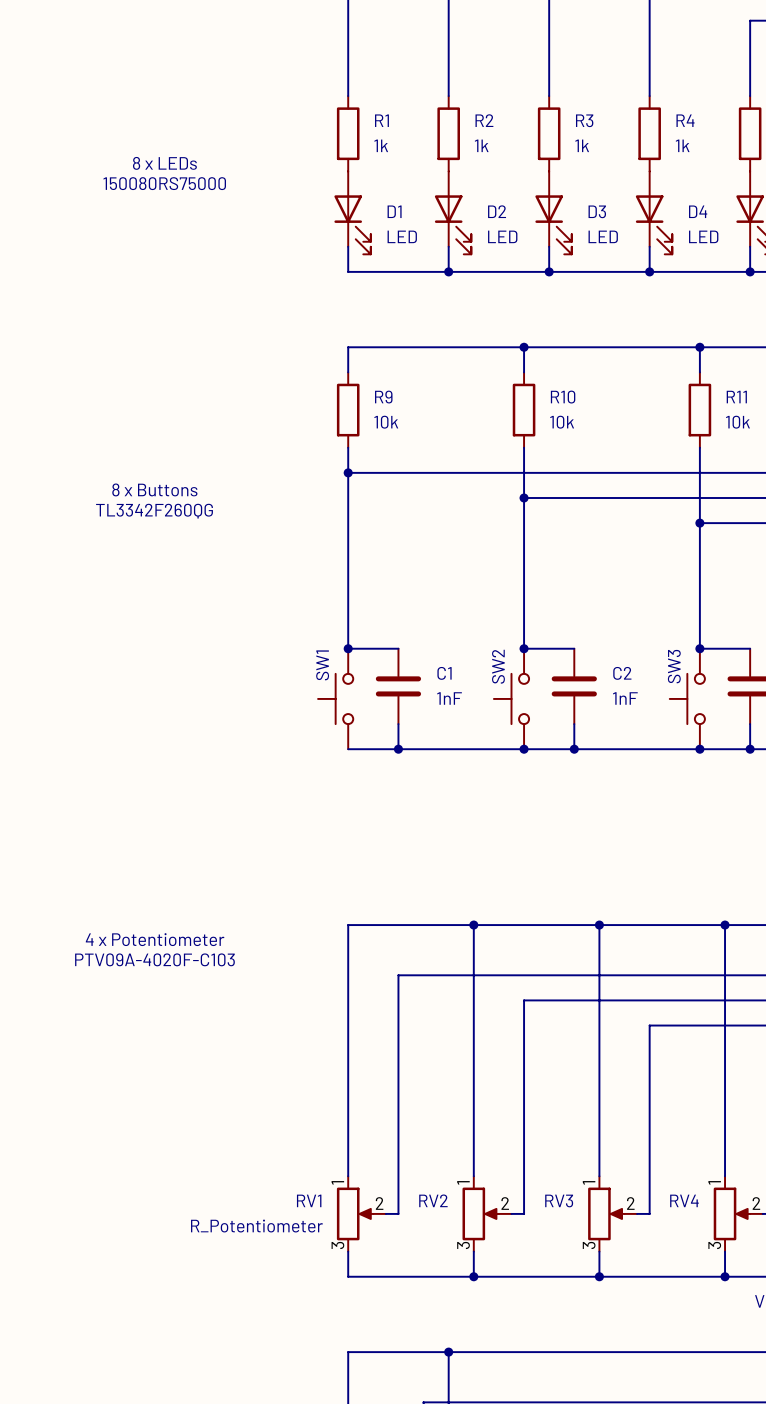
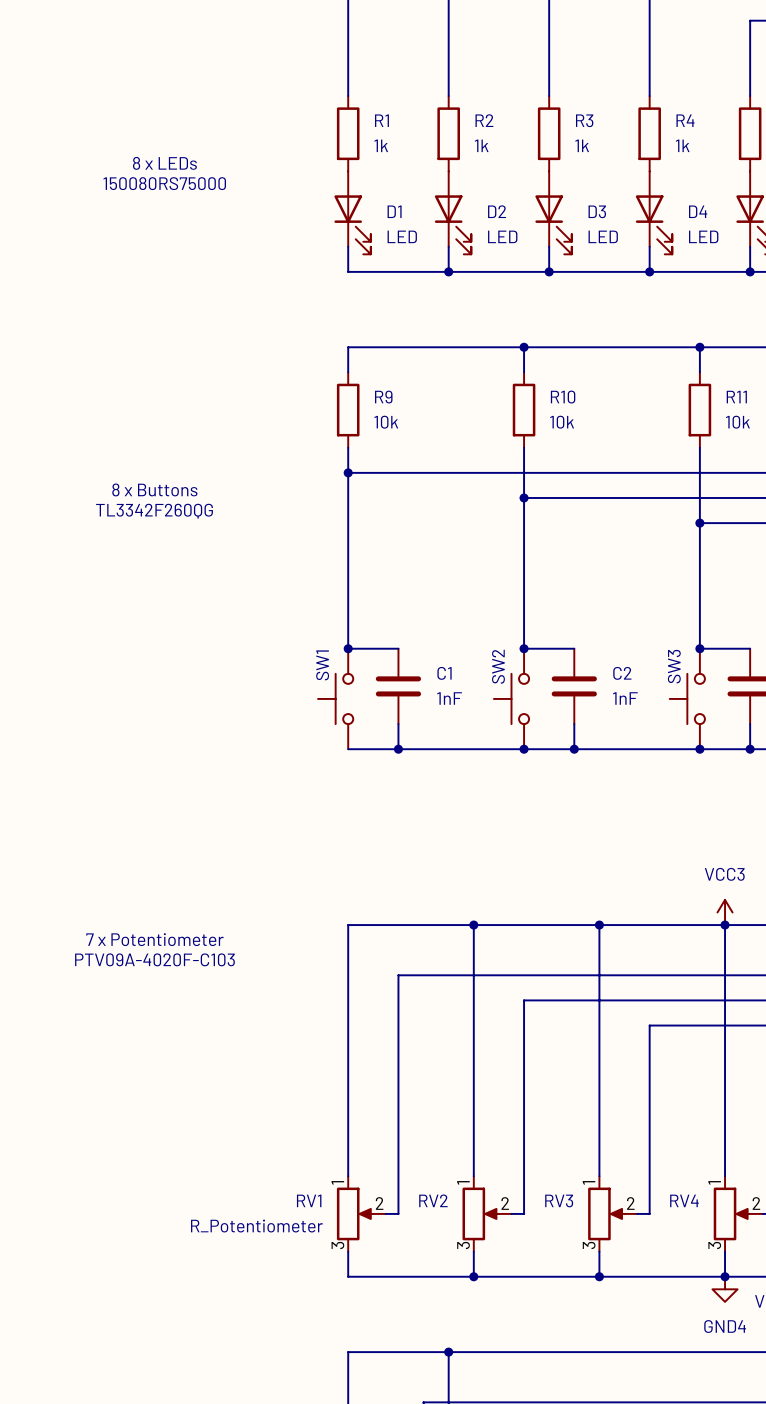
power symbol: none -> VCC3 (725, 912)
text: 4 x Potentiometer (155, 939) -> 7 x Potentiometer (154, 939)
power symbol: none -> GND4 (725, 1289)

